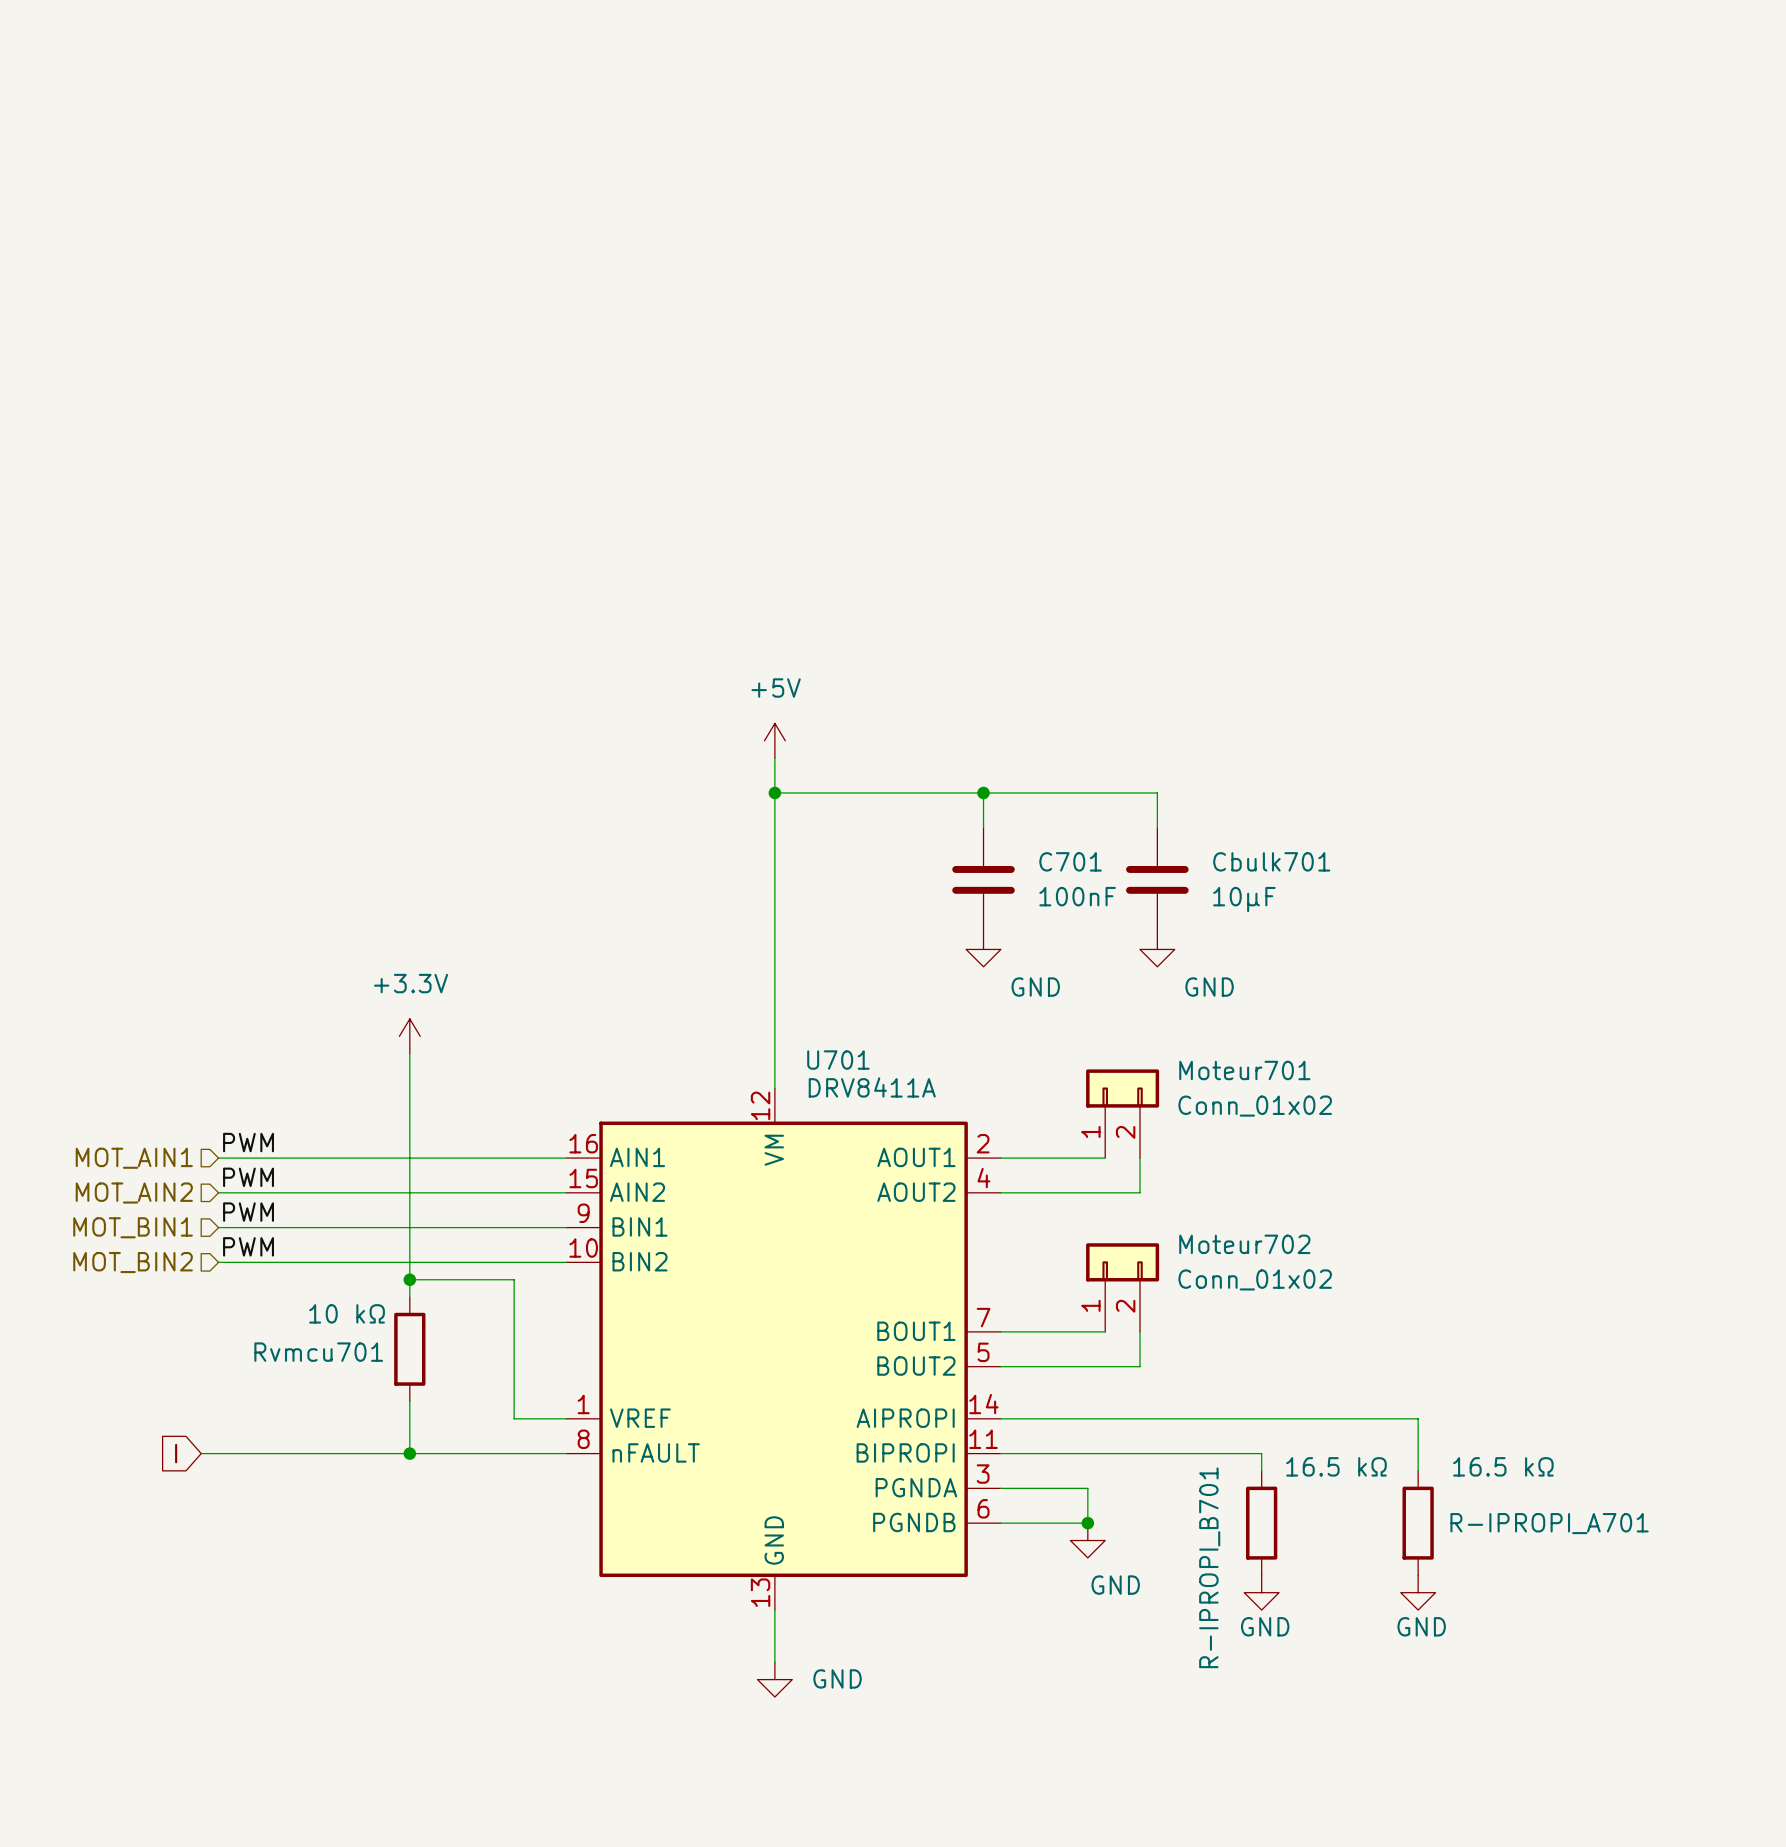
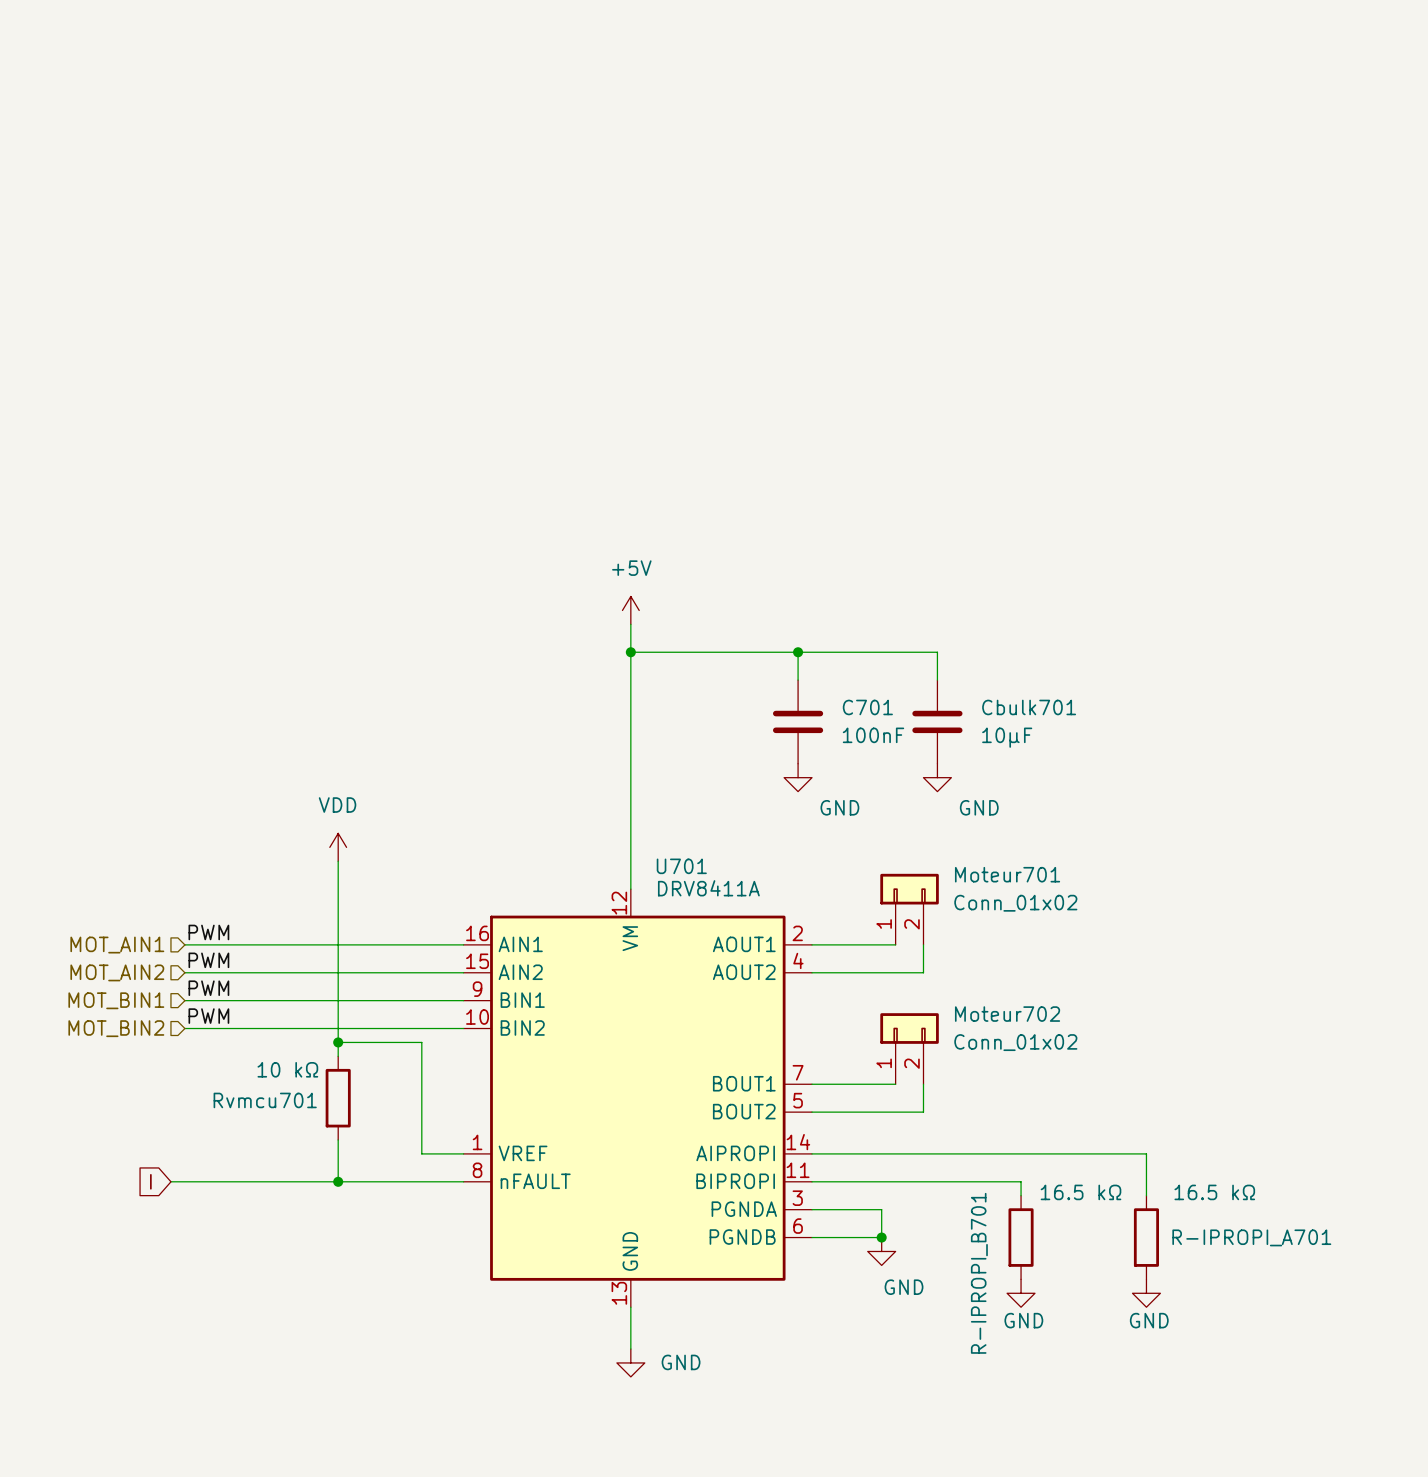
power symbol: +3.3V (409, 1036) -> VDD (338, 847)

